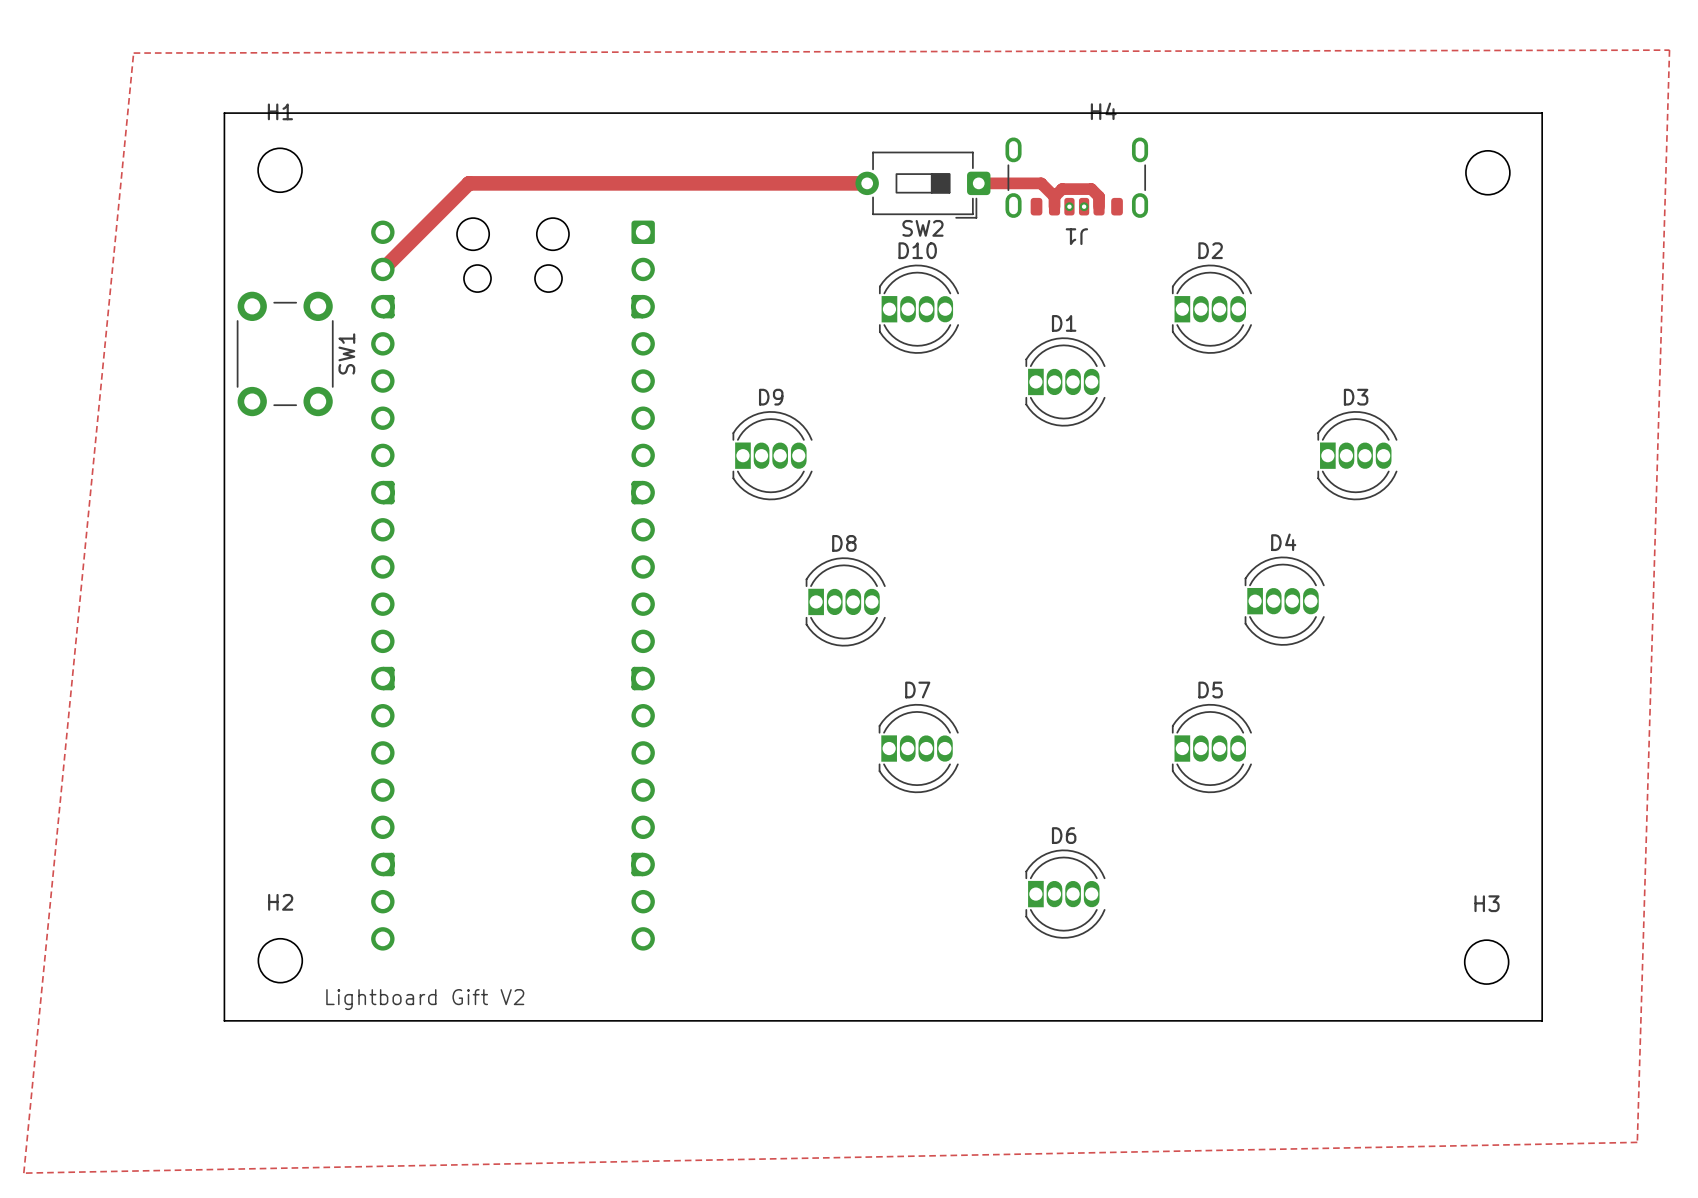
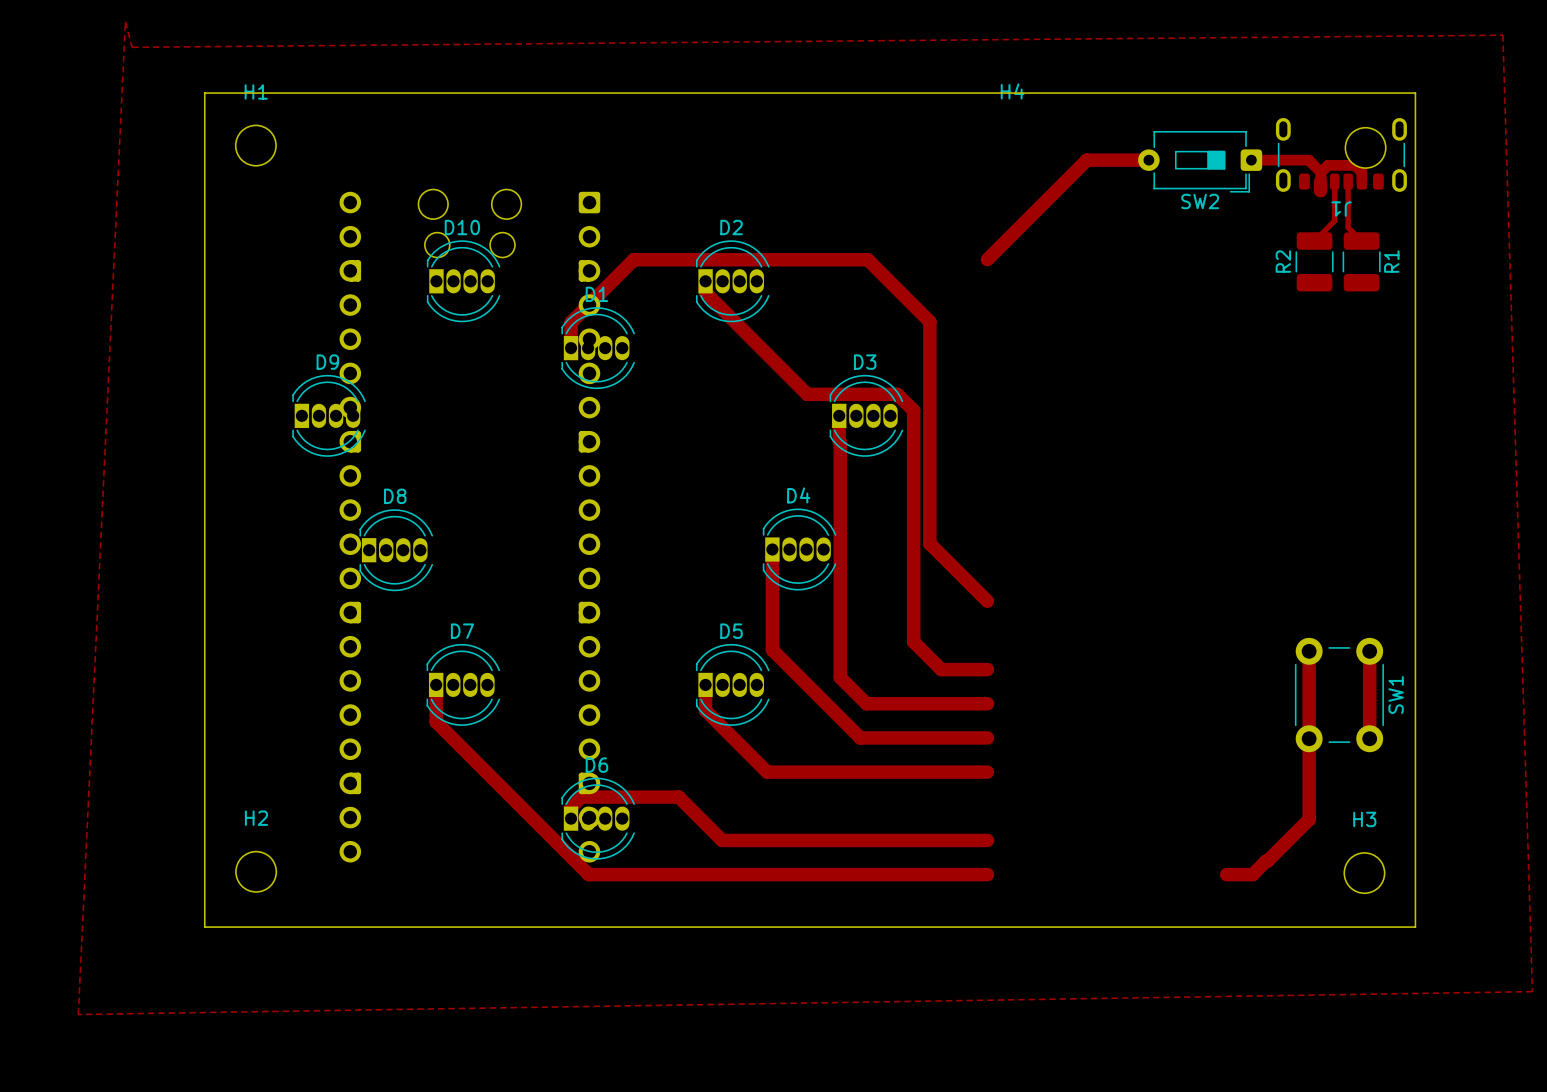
zone outline: (1669, 50) (1637, 1142) (23, 1173) (133, 53) (1669, 50) -> (125, 21) (78, 1014) (1532, 991) (1502, 35) (132, 47) (125, 21)
J1 position: (1076, 177) -> (1341, 154)
track: (867, 183) (468, 183) (382, 269) -> none
track: (978, 183) (1041, 183) (1054, 196) -> none
SW2 position: (922, 185) -> (1200, 161)
track: none -> (1148, 160) (1086, 160) (987, 259)
track: none -> (1251, 160) (1308, 160) (1320, 172)
track: (1054, 196) (1062, 189) (1091, 189) (1099, 196) (1099, 206) -> none
track: none -> (1320, 172) (1327, 165) (1354, 165) (1361, 172) (1361, 181)
via: (1069, 206) -> none
via: (1084, 206) -> none
track: none -> (1320, 181) (1320, 190)
track: none -> (1334, 181) (1334, 220) (1314, 241)
track: none -> (1348, 181) (1348, 227) (1361, 241)
R2: none -> (1314, 261)
R1: none -> (1361, 261)
D10 position: (919, 309) -> (463, 281)
D2 position: (1211, 309) -> (732, 281)
track: none -> (705, 281) (705, 292) (807, 394) (897, 394) (913, 410) (913, 641) (941, 669) (987, 669)
SW1 position: (285, 353) -> (1339, 695)
D1 position: (1065, 381) -> (598, 348)
track: none -> (571, 348) (571, 322) (633, 259) (867, 259) (929, 321) (929, 543) (987, 601)
D9 position: (772, 455) -> (329, 415)
D3 position: (1357, 455) -> (866, 415)
track: none -> (839, 415) (840, 677) (866, 703) (987, 703)
D8 position: (845, 601) -> (396, 550)
D4 position: (1284, 601) -> (799, 549)
track: none -> (772, 549) (772, 649) (860, 737) (987, 737)
track: none -> (1309, 651) (1309, 819) (1252, 874) (1226, 874)
track: none -> (1369, 651) (1369, 738)
D7 position: (918, 748) -> (463, 684)
D5 position: (1211, 748) -> (732, 684)
track: none -> (436, 684) (436, 721) (588, 874) (987, 874)
track: none -> (705, 684) (705, 710) (767, 772) (987, 772)
D6 position: (1065, 894) -> (598, 818)
track: none -> (571, 818) (571, 807) (581, 797) (678, 797) (722, 840) (987, 840)
text: Lightboard Gift V2 (425, 999) -> none

